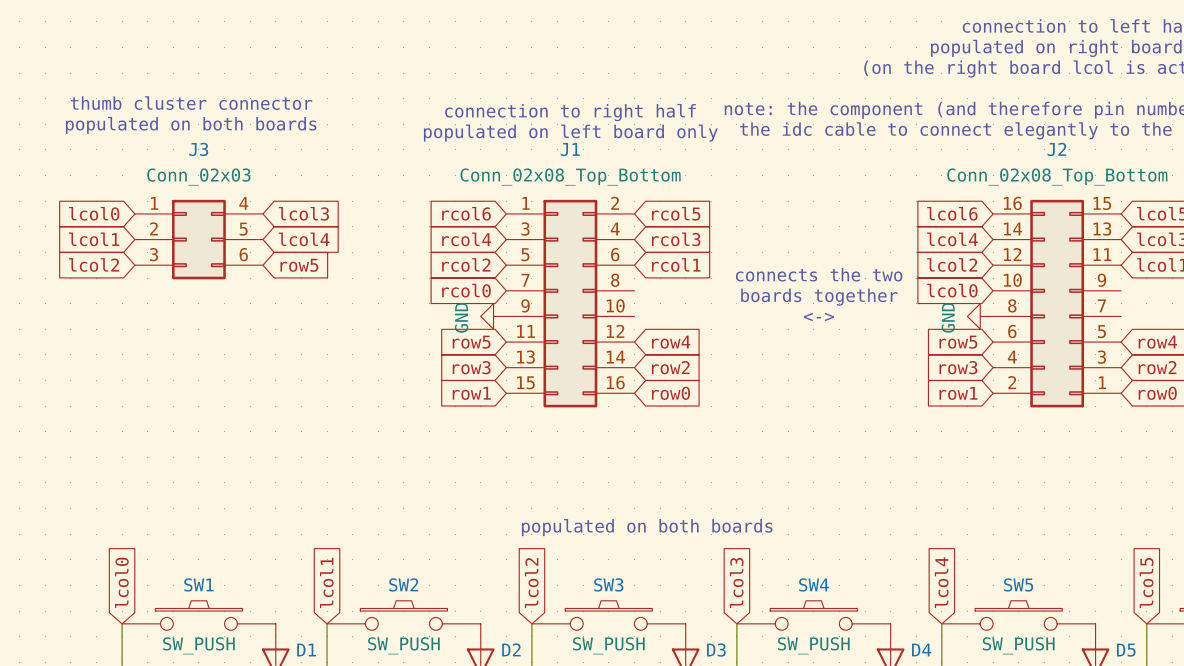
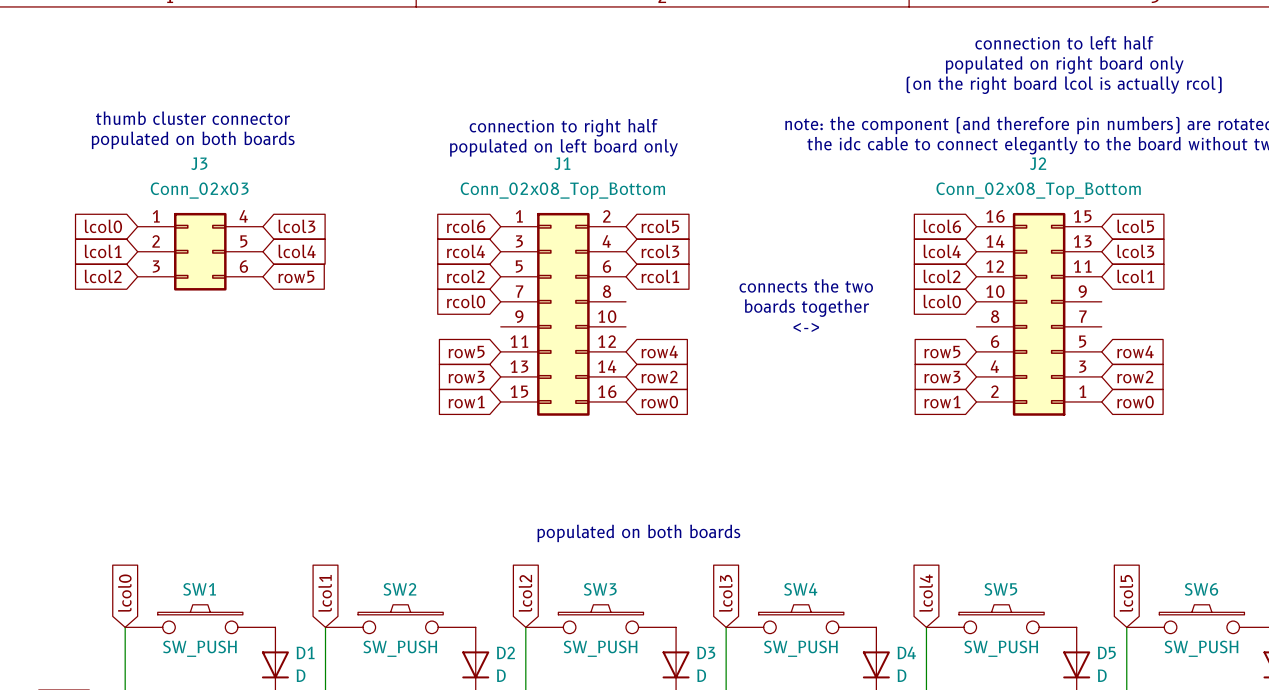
power symbol: GND (493, 316) -> none
power symbol: GND (980, 316) -> none

